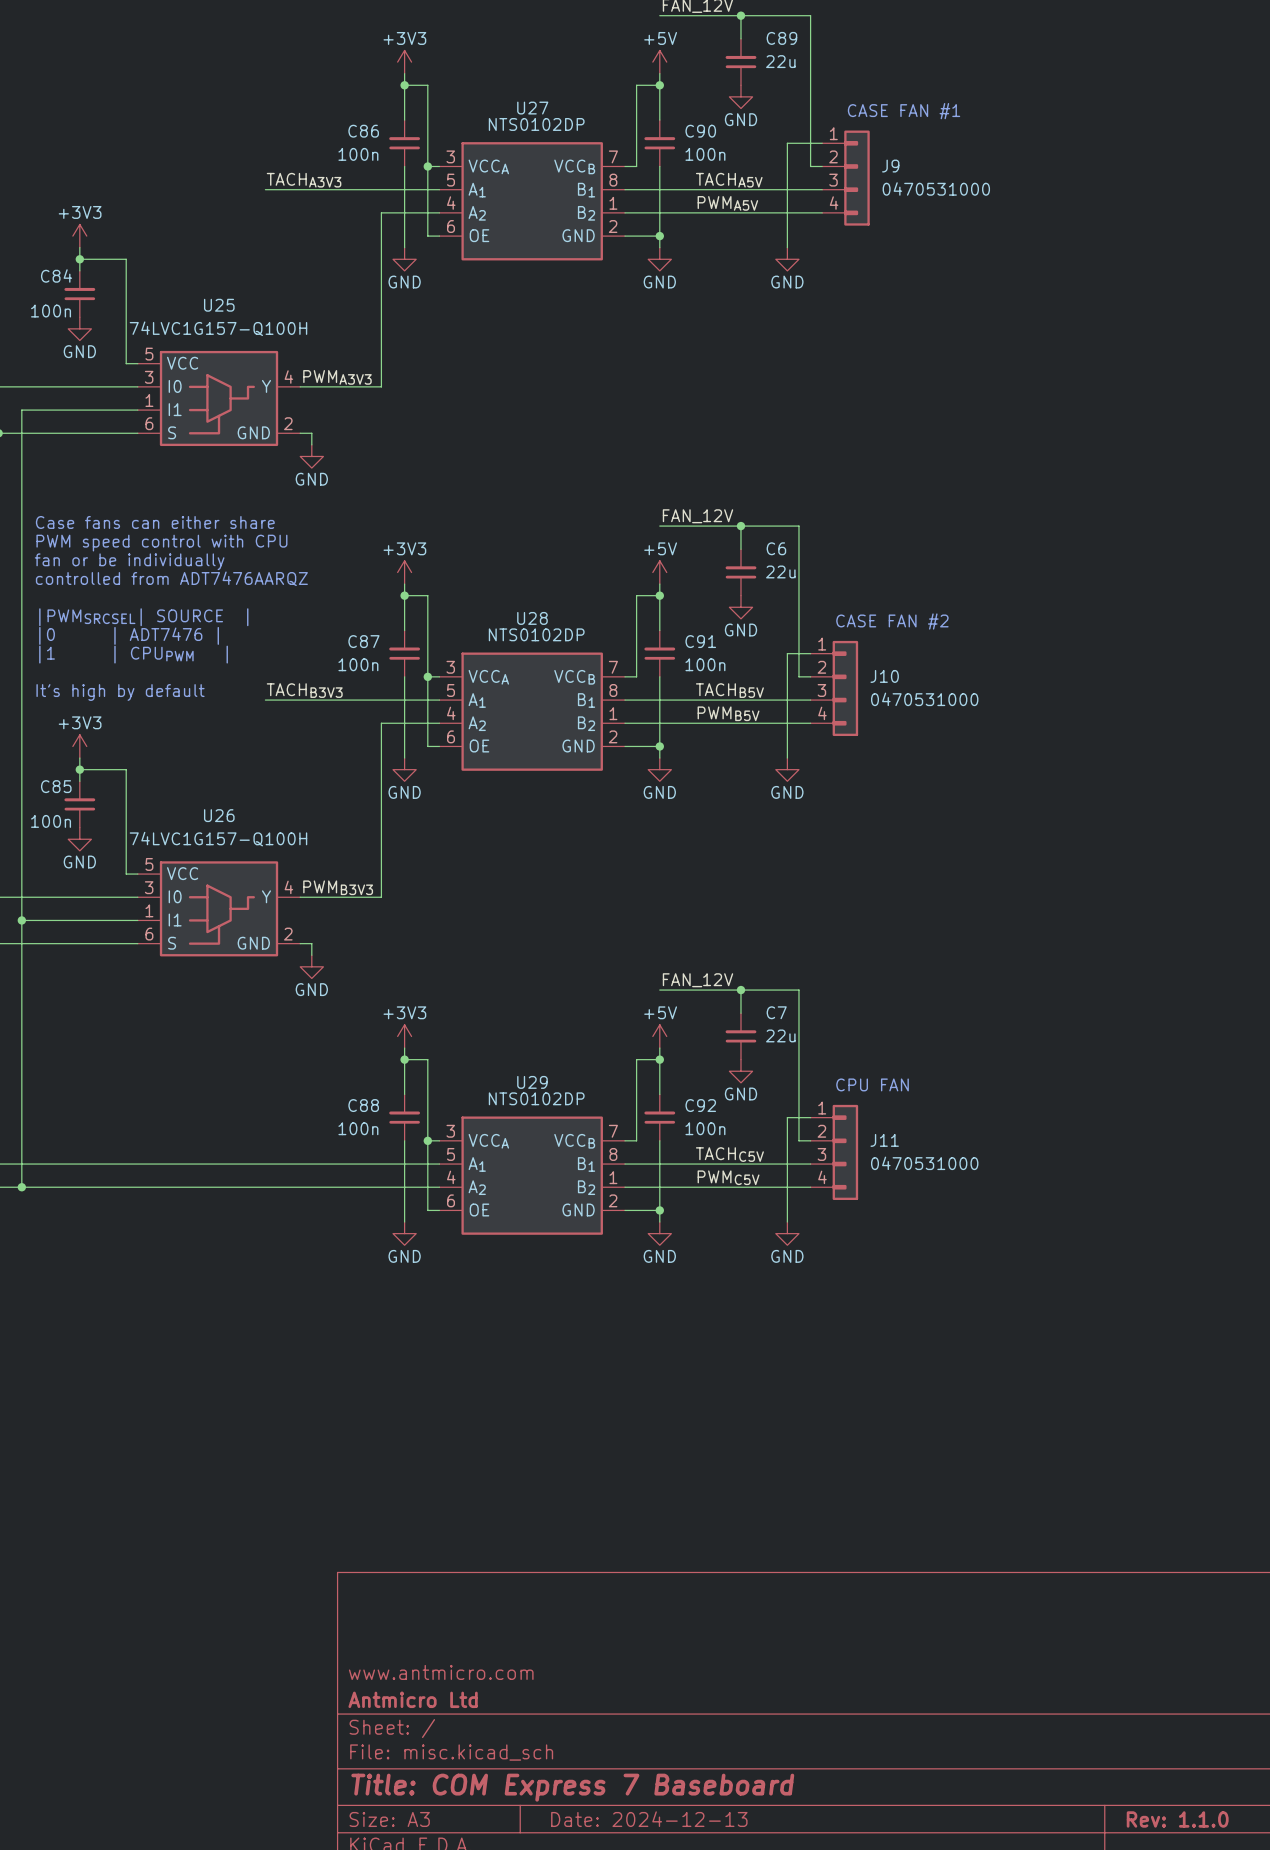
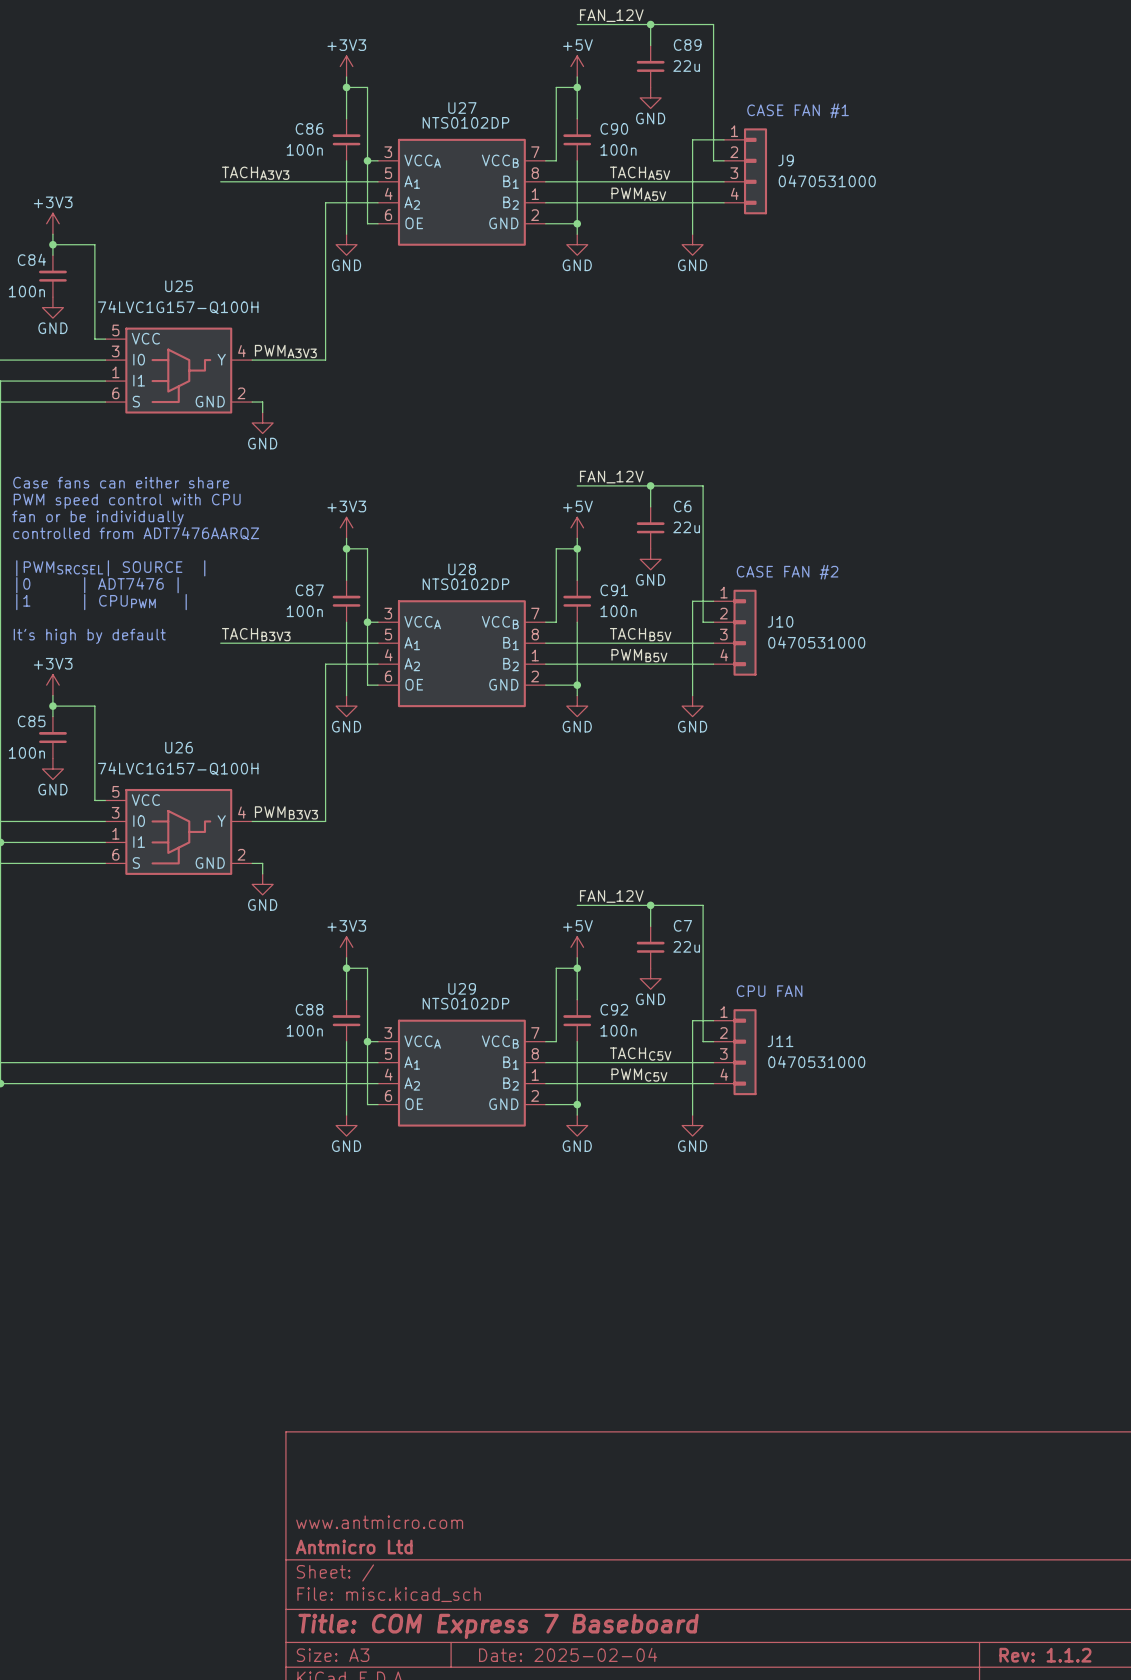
title block: Date: 2024-12-13 (649, 1819) -> Date: 2025-02-04 (568, 1654)
title block: Rev: 1.1.0 (1177, 1819) -> Rev: 1.1.2 (1045, 1655)

